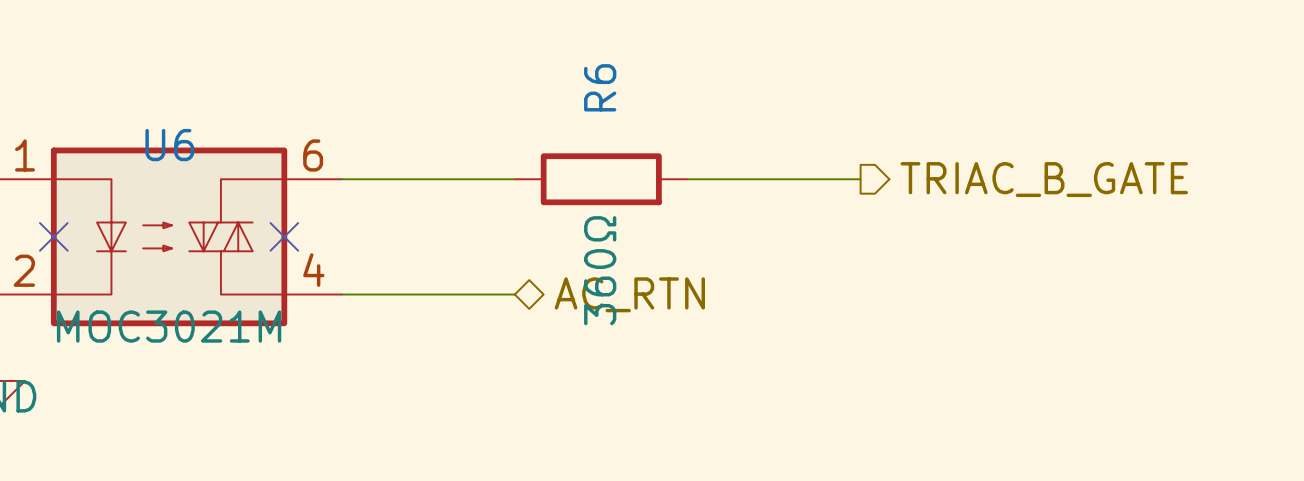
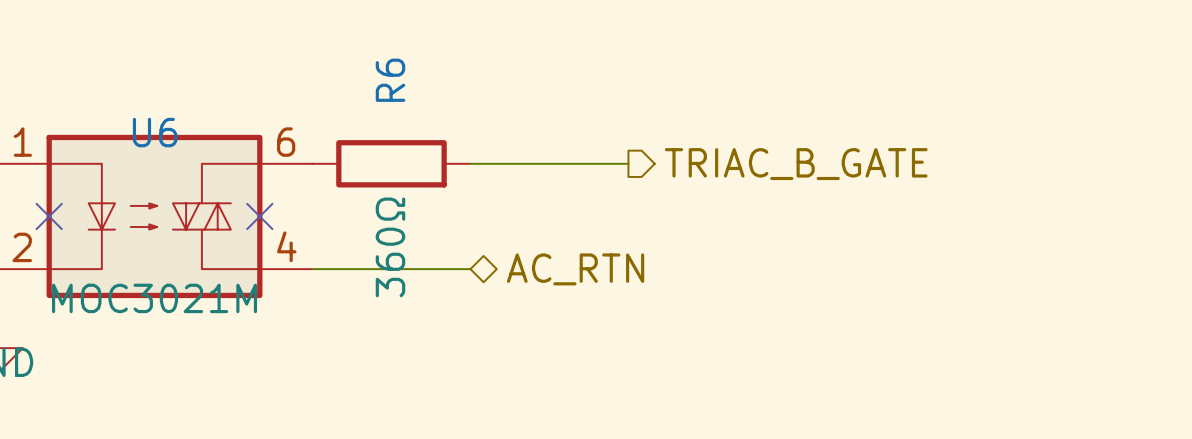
wire: (341, 179) (514, 179) -> (628, 163) (470, 163)
R6 position: (601, 179) -> (391, 163)
wire: (687, 179) (860, 179) -> none
hierarchical label position: TRIAC_B_GATE (1044, 179) -> TRIAC_B_GATE (796, 164)

